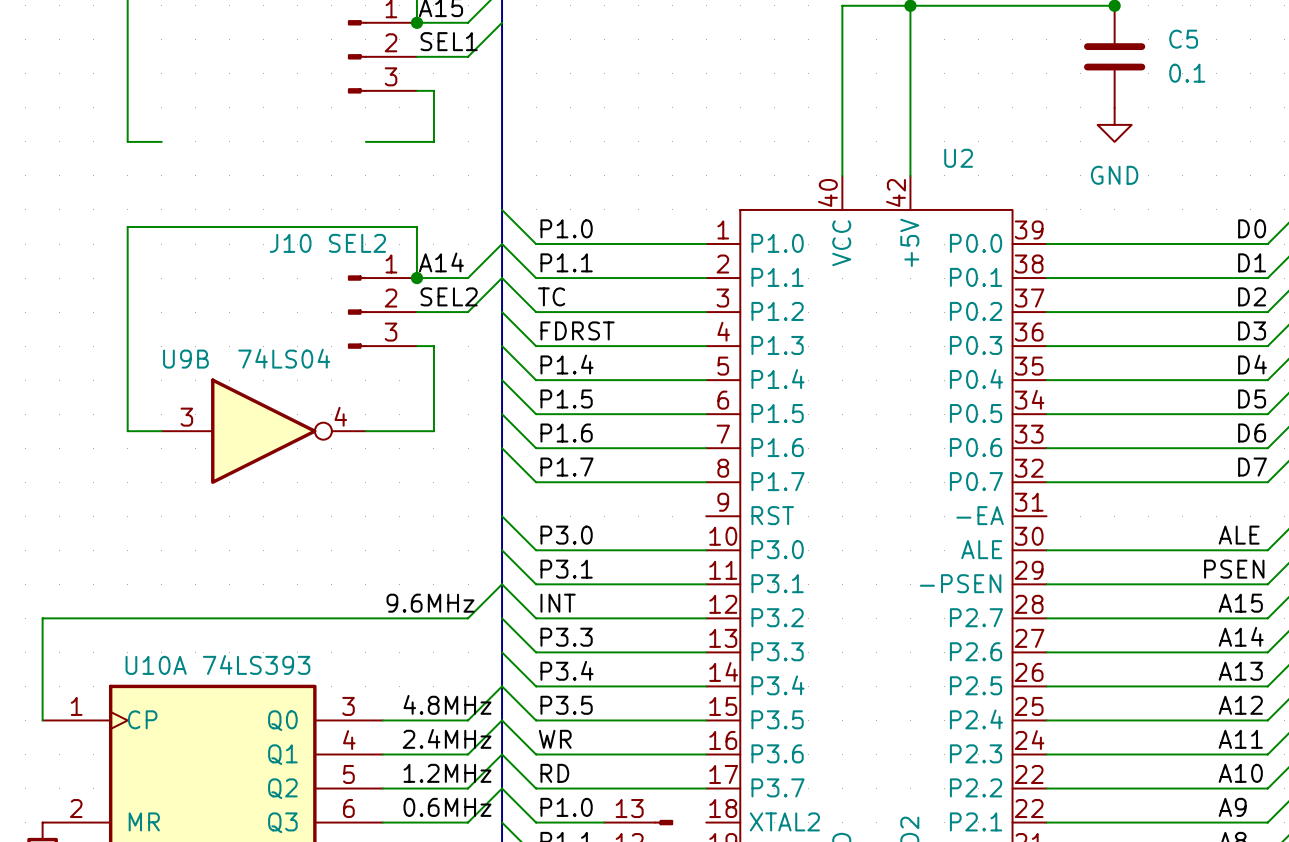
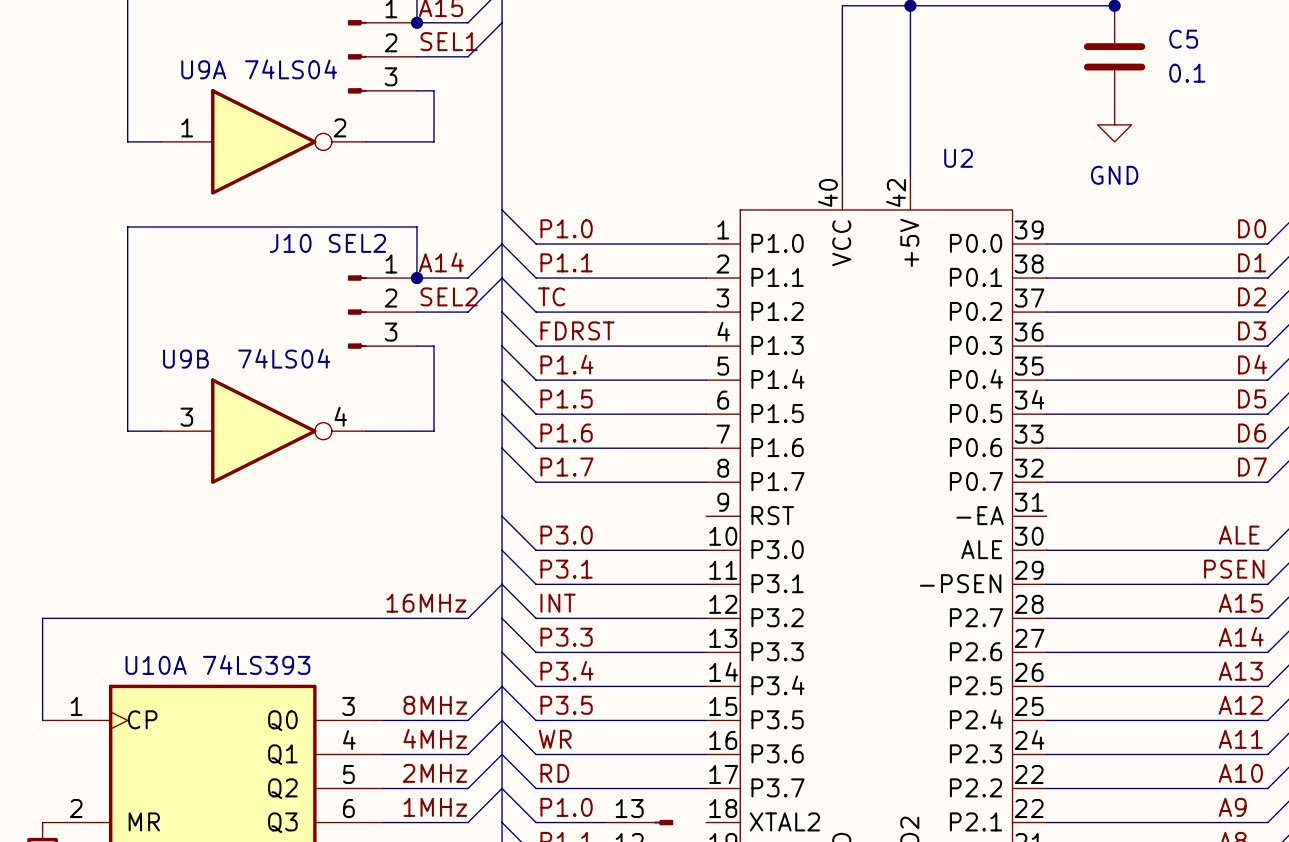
U9A: none -> 74LS04 (263, 141)
label: 9.6MHz (430, 603) -> 16MHz (426, 603)
label: 4.8MHz (447, 704) -> 8MHz (435, 705)
label: 2.4MHz (447, 738) -> 4MHz (435, 738)
label: 1.2MHz (447, 773) -> 2MHz (434, 773)
label: 0.6MHz (447, 807) -> 1MHz (435, 807)

